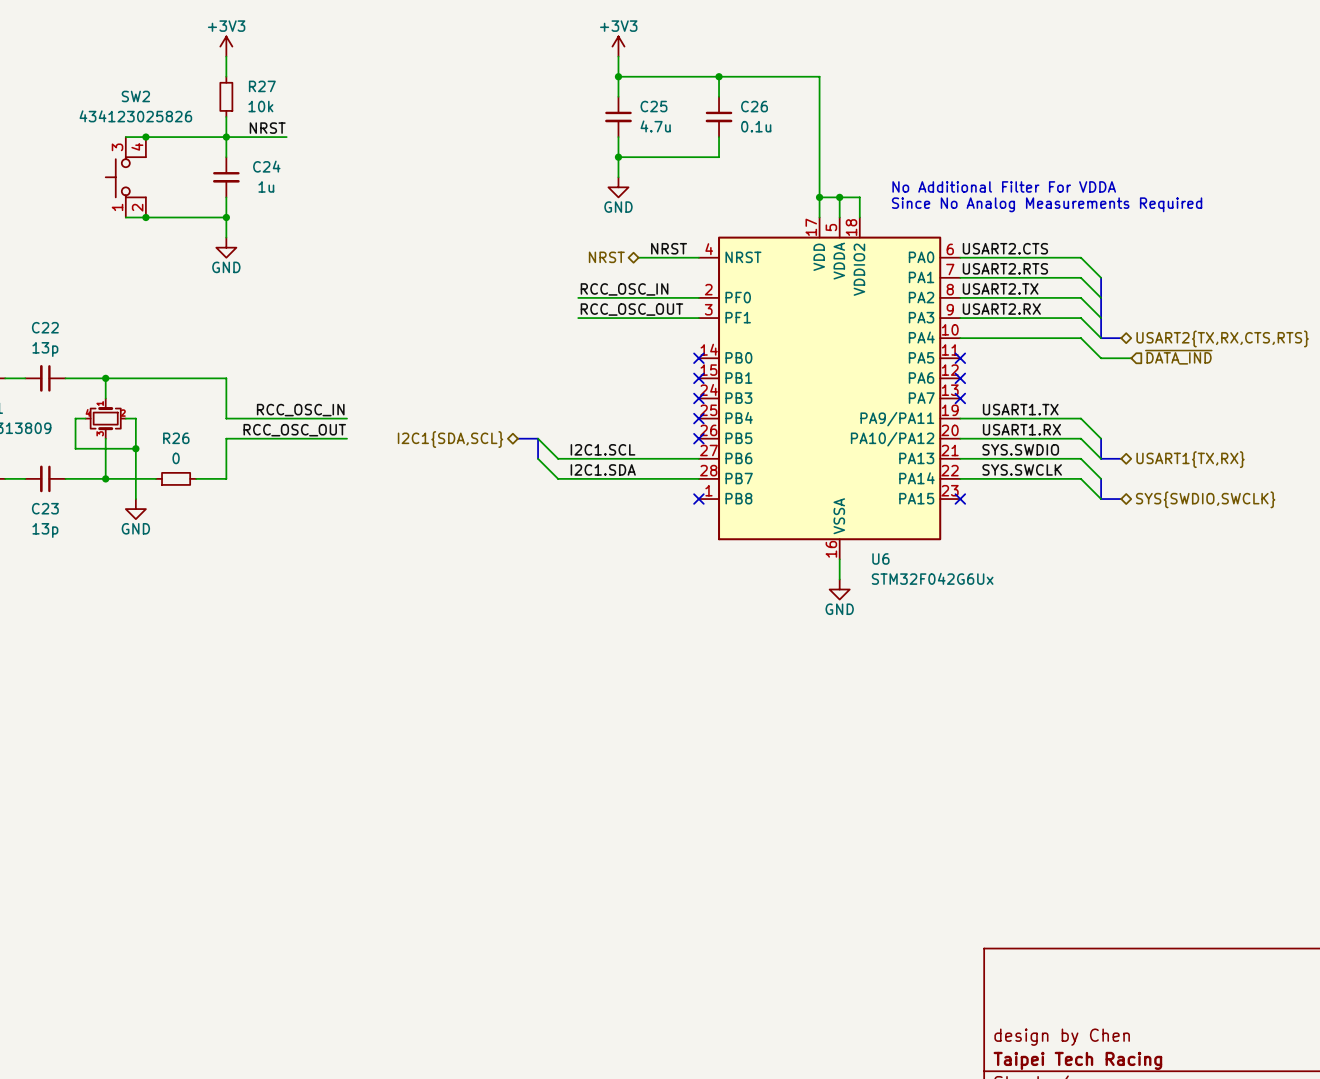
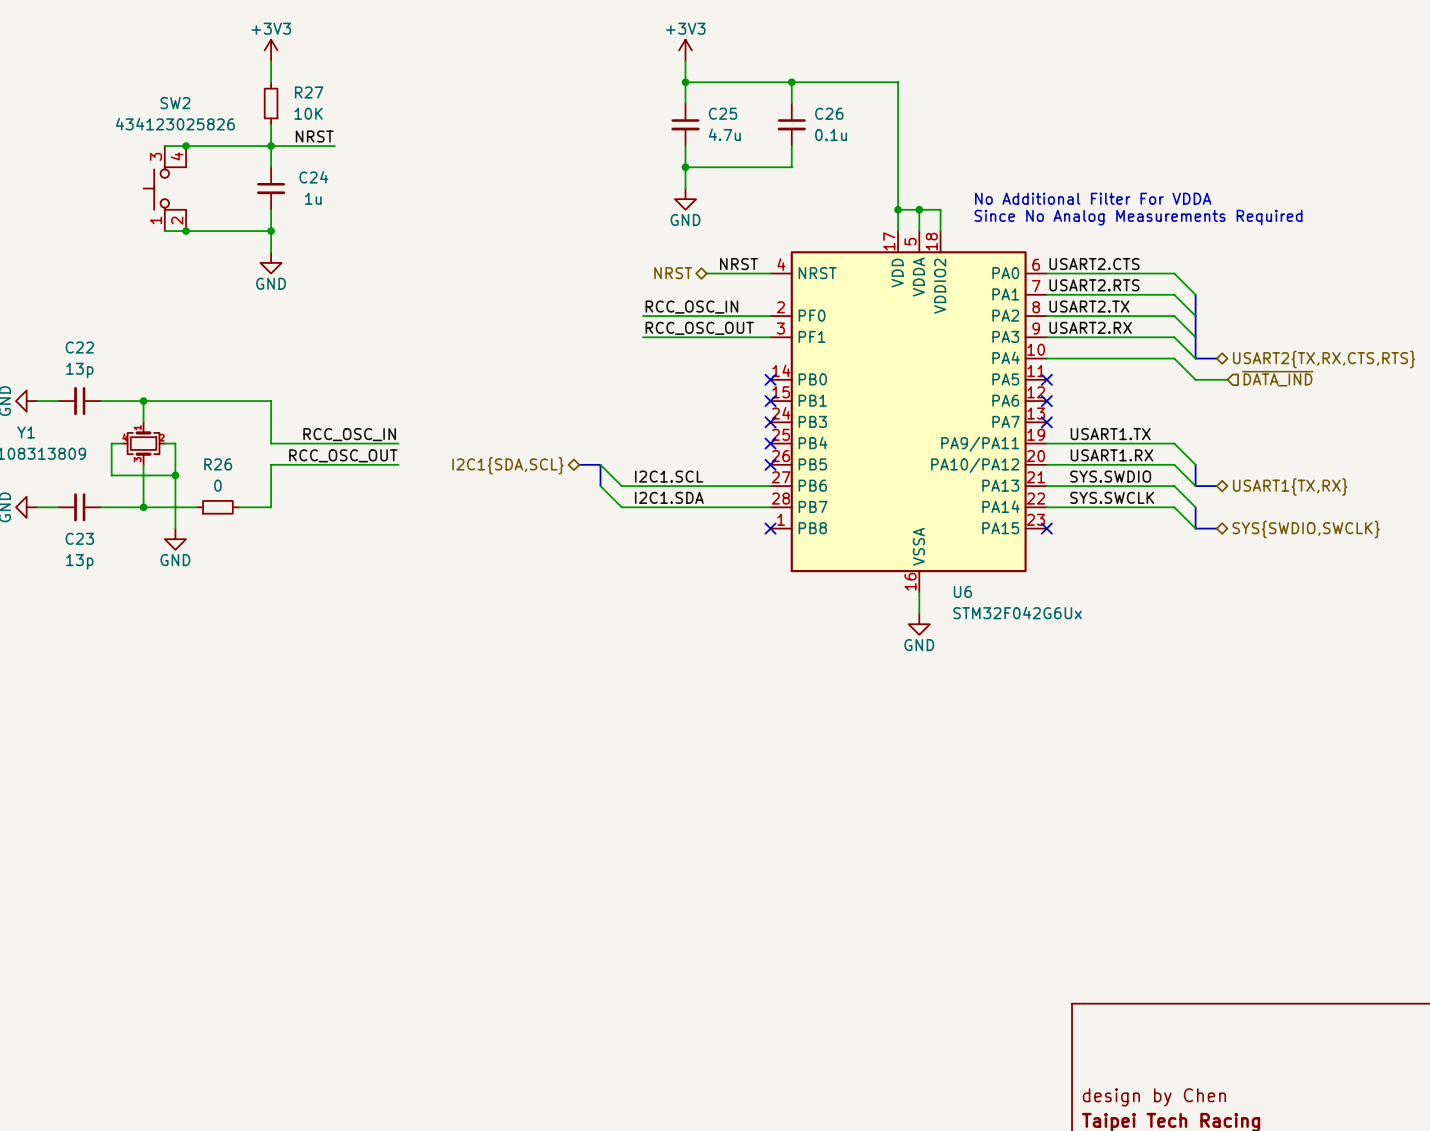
R27 value: 10k (260, 106) -> 10K (308, 113)

